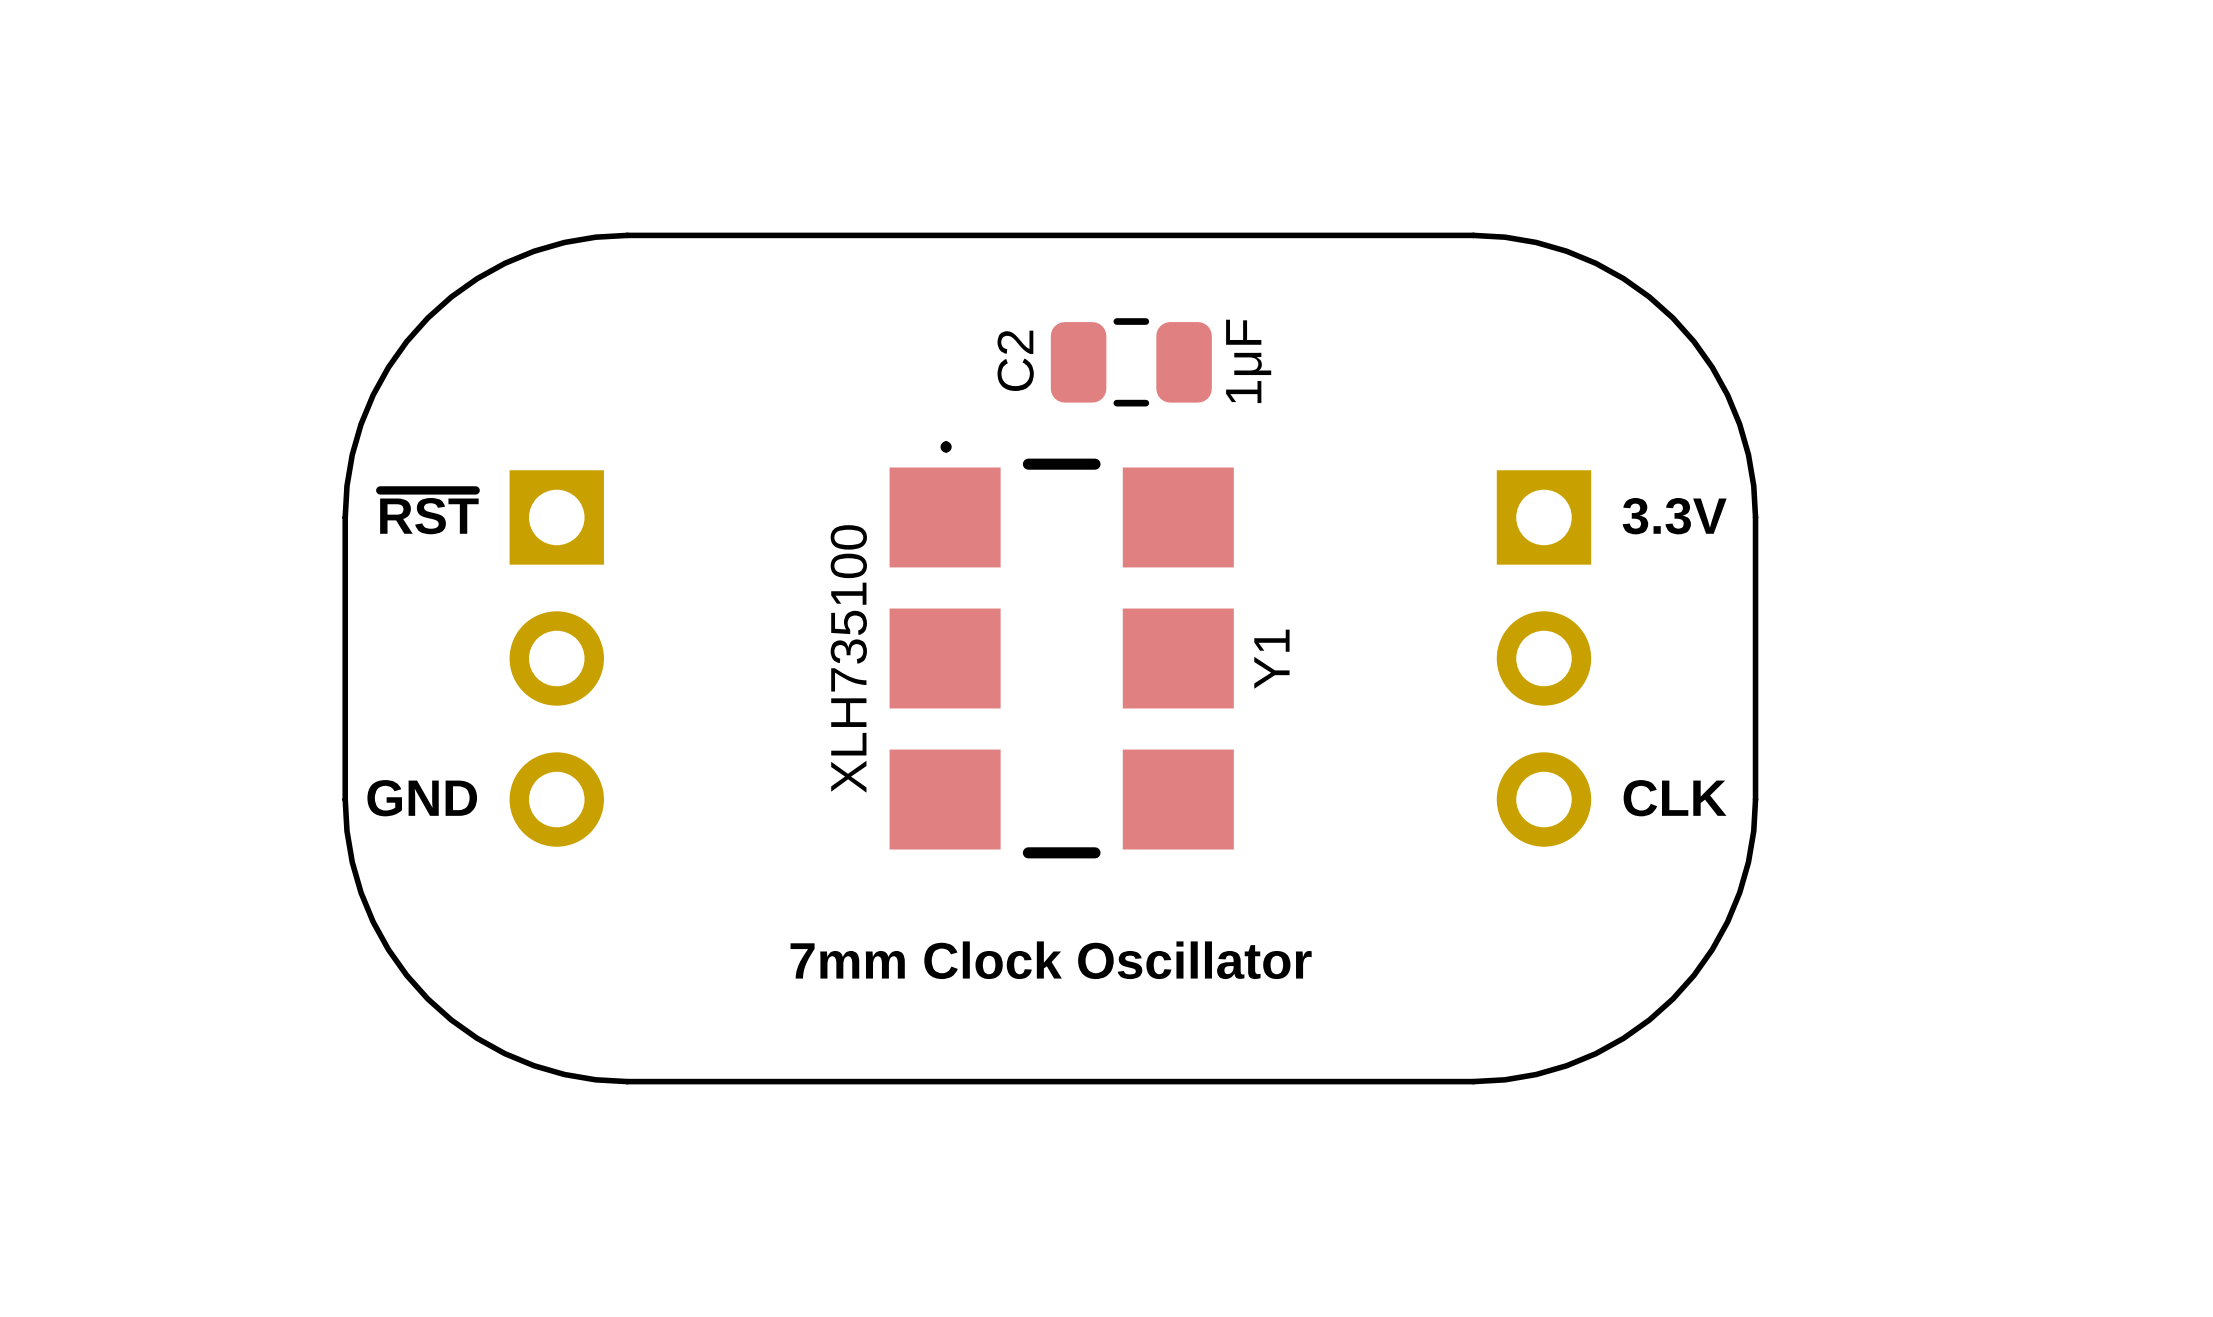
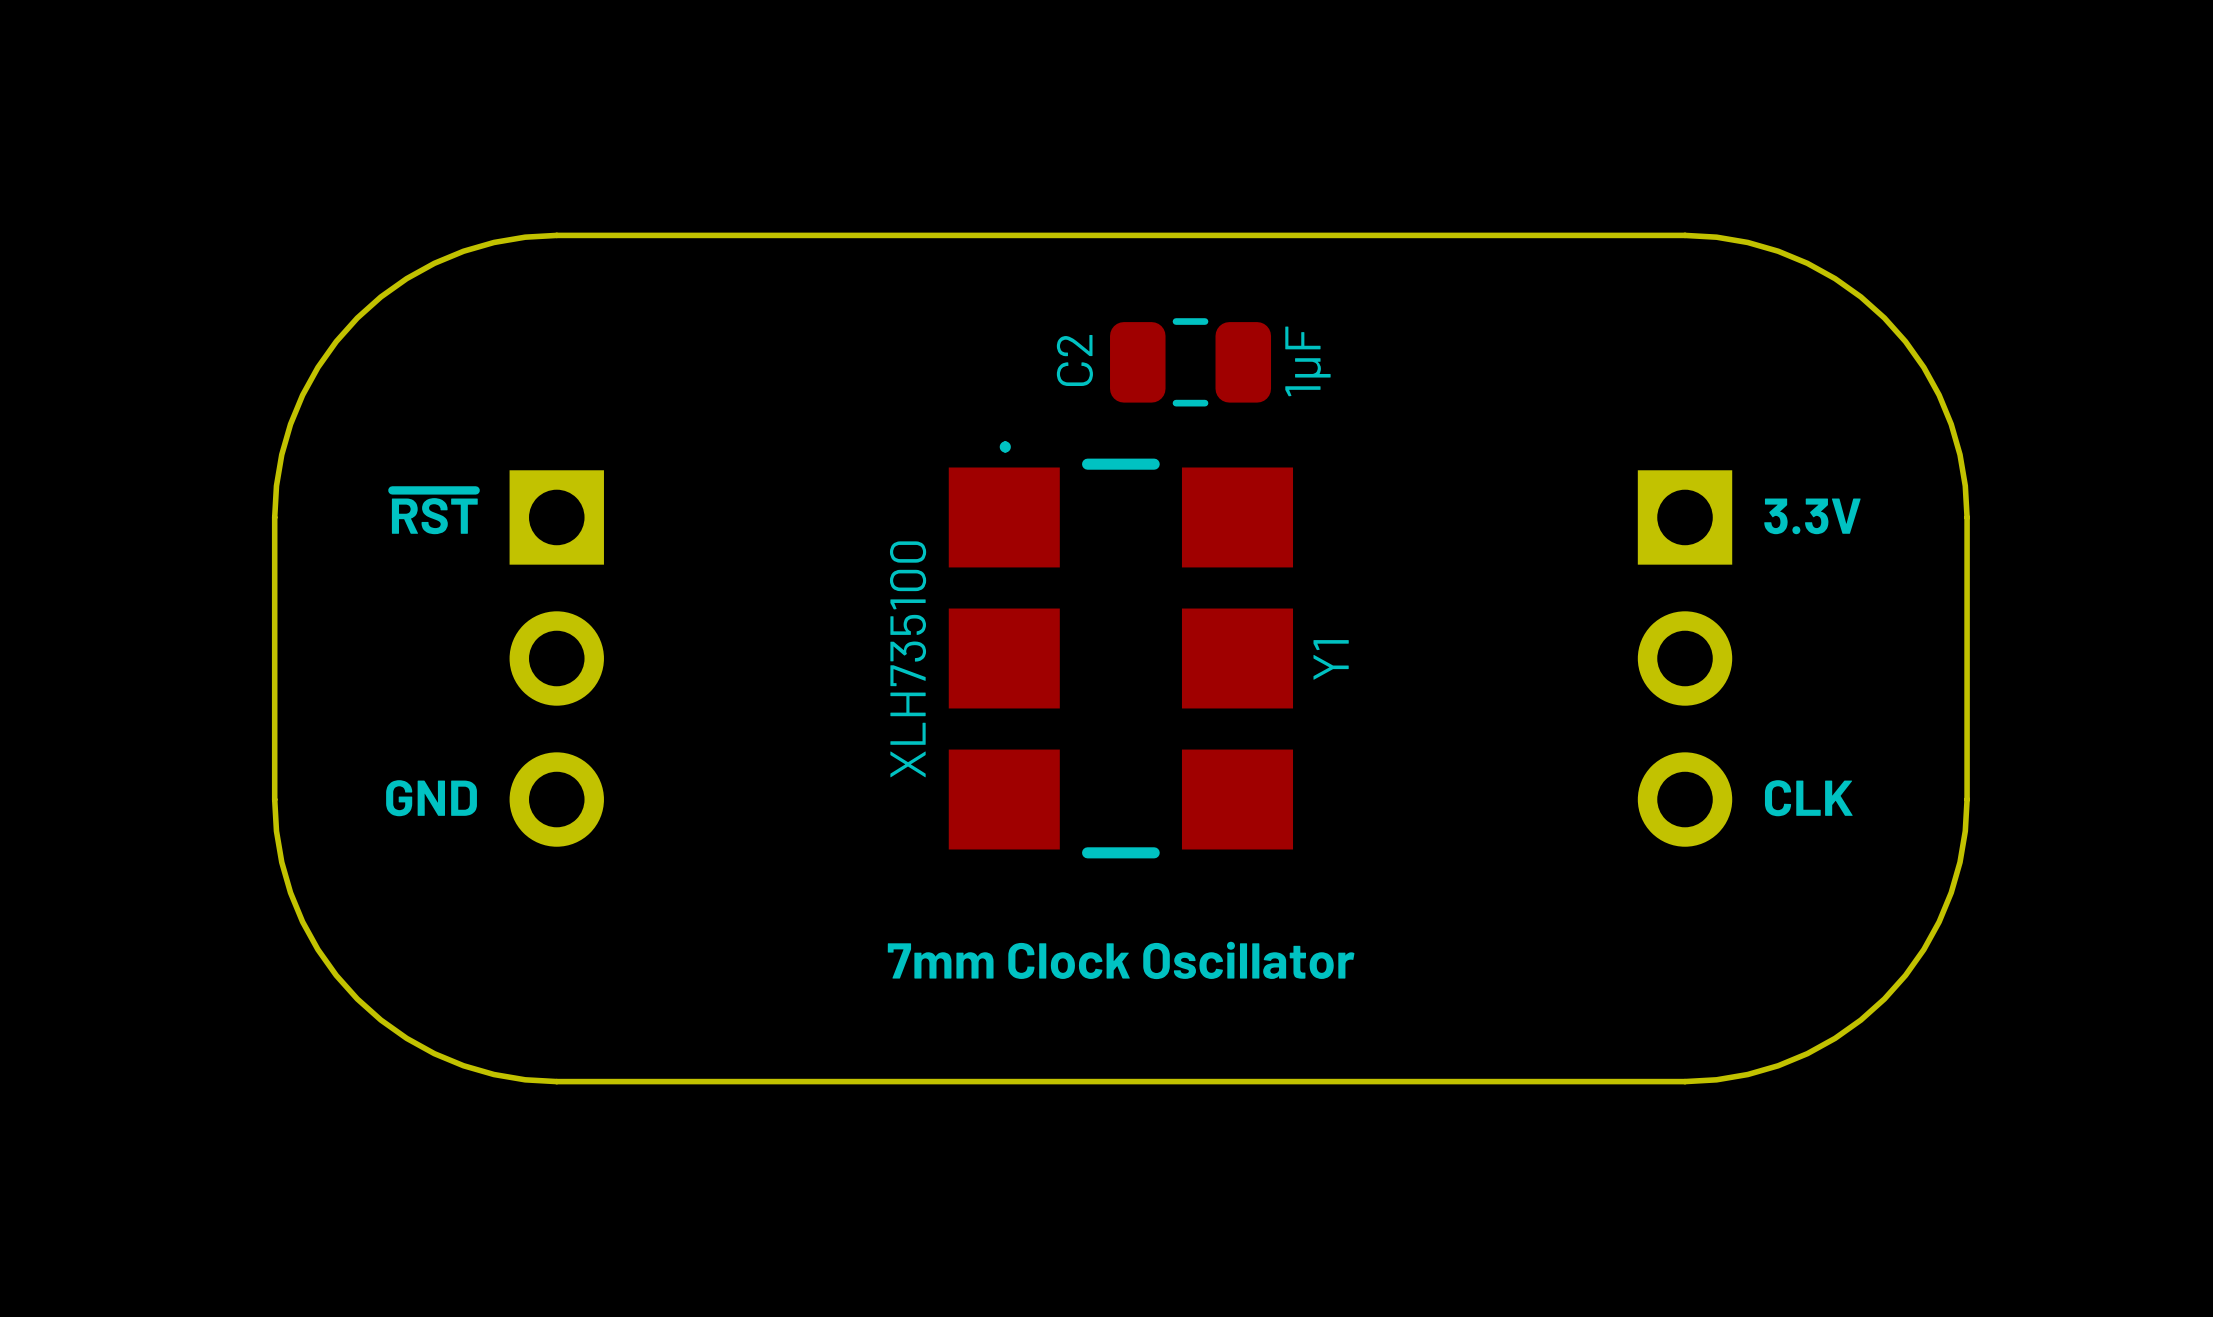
board edge: (627, 235) (595, 237) (564, 242) (534, 251) (504, 263) (477, 278) (451, 296) (427, 318) (406, 341) (388, 367) (373, 395) (361, 424) (352, 454) (346, 485) (345, 517) (345, 799) (346, 831) (352, 862) (361, 892) (373, 921) (388, 949) (406, 975) (427, 998) (451, 1020) (477, 1038) (504, 1053) (534, 1065) (564, 1074) (595, 1079) (627, 1081) -> (627, 235) (525, 237) (494, 242) (463, 251) (434, 263) (406, 278) (380, 296) (357, 318) (336, 341) (317, 367) (302, 395) (290, 424) (281, 454) (276, 485) (274, 517) (274, 799) (276, 831) (281, 862) (290, 892) (302, 921) (317, 949) (336, 975) (357, 998) (380, 1020) (406, 1038) (434, 1053) (463, 1065) (494, 1074) (525, 1079) (556, 1081) (627, 1081)
board edge: (1473, 235) (1505, 237) (1536, 242) (1566, 251) (1595, 263) (1623, 278) (1649, 296) (1672, 318) (1693, 341) (1712, 367) (1727, 395) (1739, 424) (1748, 454) (1753, 485) (1755, 517) (1755, 799) (1753, 831) (1748, 862) (1739, 892) (1727, 921) (1712, 949) (1693, 975) (1672, 998) (1649, 1020) (1623, 1038) (1595, 1053) (1566, 1065) (1536, 1074) (1505, 1079) (1473, 1081) -> (1473, 235) (1685, 235) (1716, 237) (1747, 242) (1778, 251) (1807, 263) (1835, 278) (1860, 296) (1884, 318) (1905, 341) (1923, 367) (1939, 395) (1951, 424) (1960, 454) (1965, 485) (1967, 517) (1967, 799) (1965, 831) (1960, 862) (1951, 892) (1939, 921) (1923, 949) (1905, 975) (1884, 998) (1860, 1020) (1835, 1038) (1807, 1053) (1778, 1065) (1747, 1074) (1716, 1079) (1685, 1081) (1473, 1081)
C2 position: (1131, 362) -> (1190, 362)
text position: 3.3V (1674, 516) -> 3.3V (1812, 516)
Y1 position: (1061, 649) -> (1120, 649)
part position: (1543, 658) -> (1685, 658)
text position: CLK (1675, 798) -> CLK (1808, 798)
text position: 7mm Clock Oscillator (1051, 960) -> 7mm Clock Oscillator (1121, 960)

